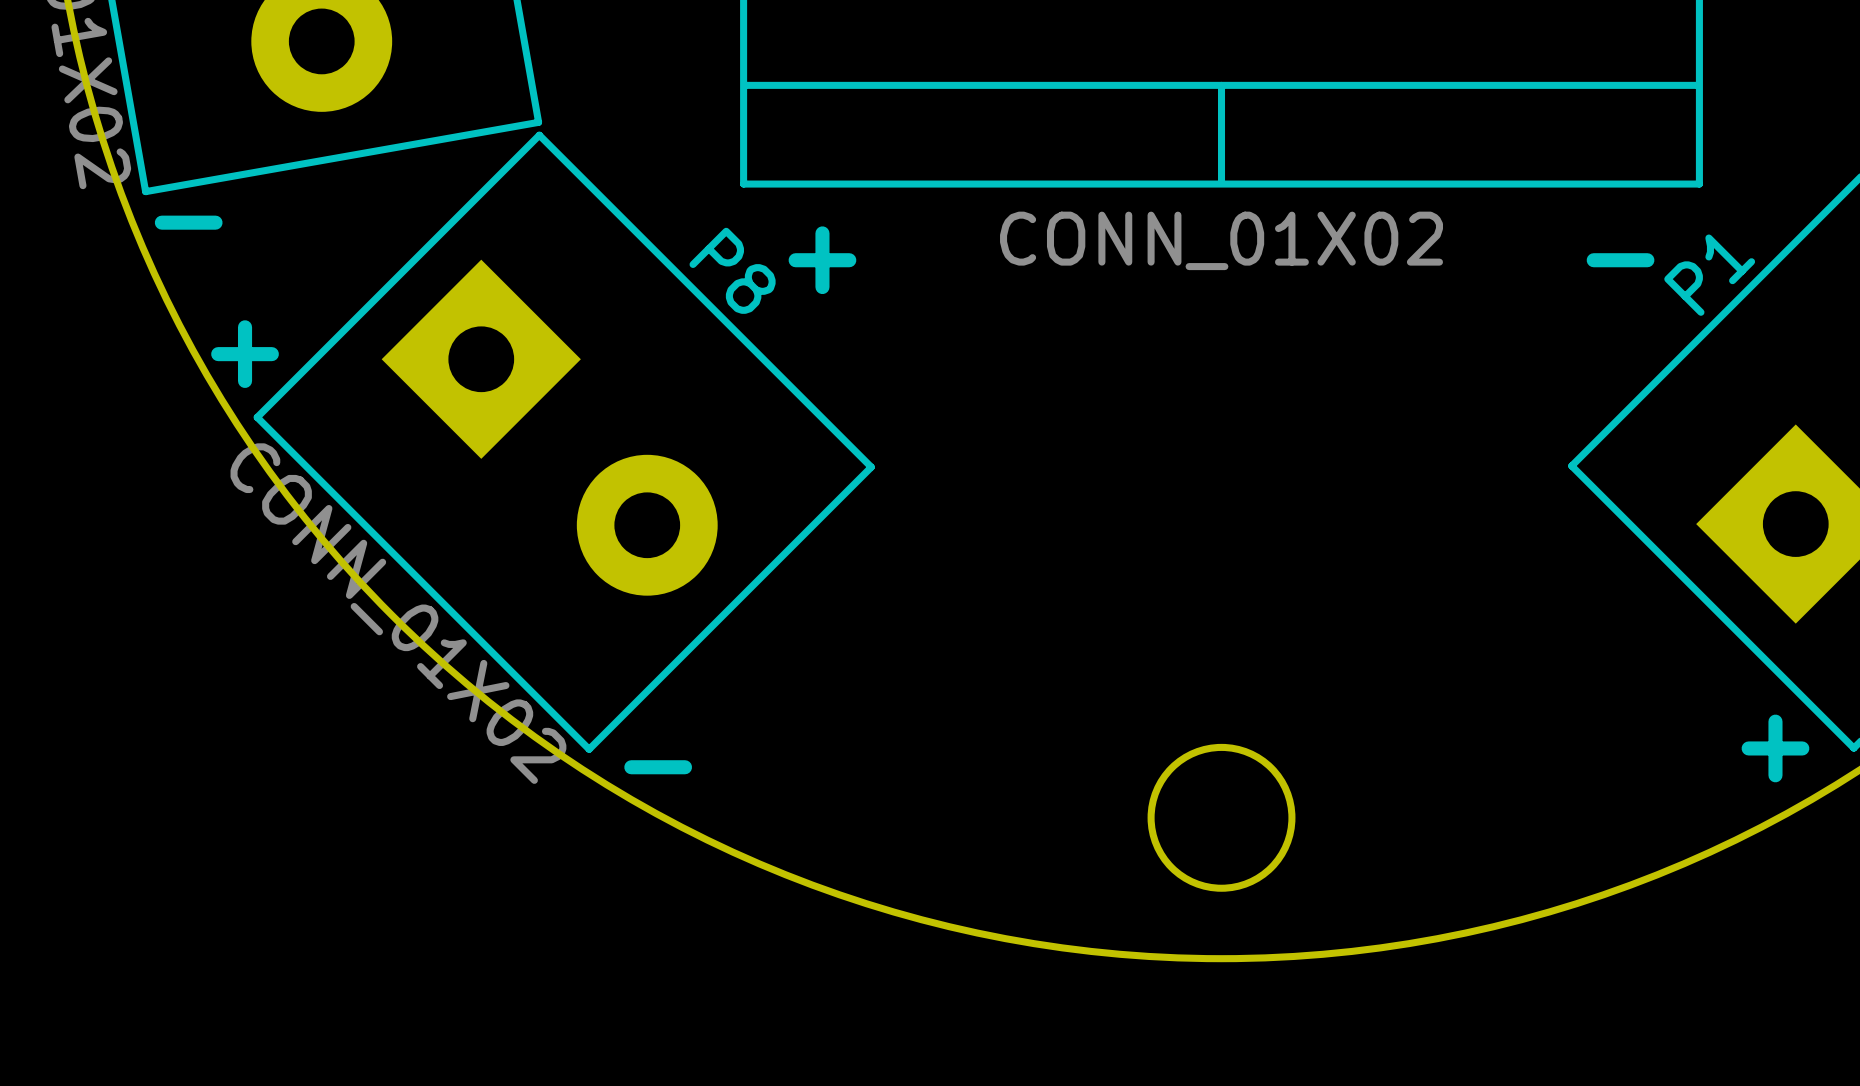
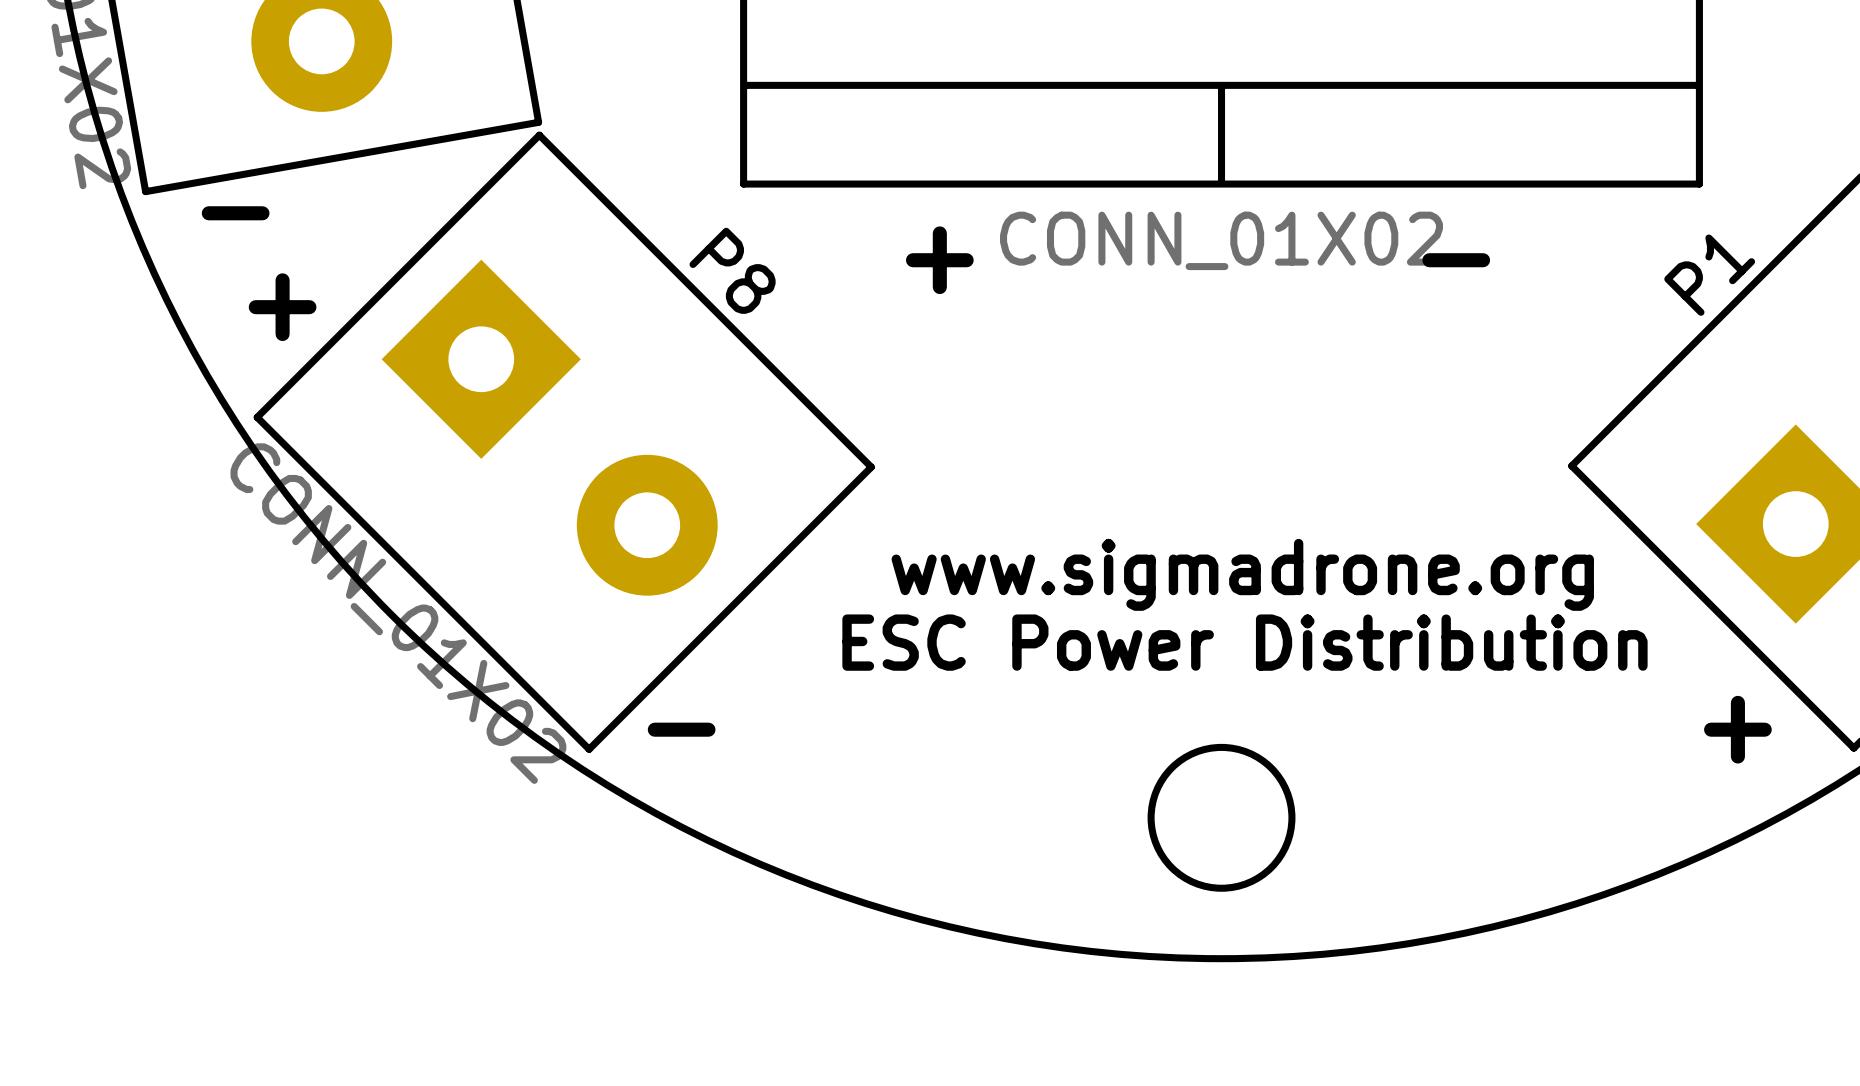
text position: - (188, 222) -> - (235, 213)
text position: + (822, 260) -> + (939, 260)
text position: - (1620, 260) -> - (1456, 260)
text position: + (245, 354) -> + (282, 307)
text: none -> www.sigmadrone.org (1242, 574)
text: none -> ESC Power Distribution (1244, 642)
text position: + (1775, 748) -> + (1737, 729)
text position: - (658, 767) -> - (681, 729)

